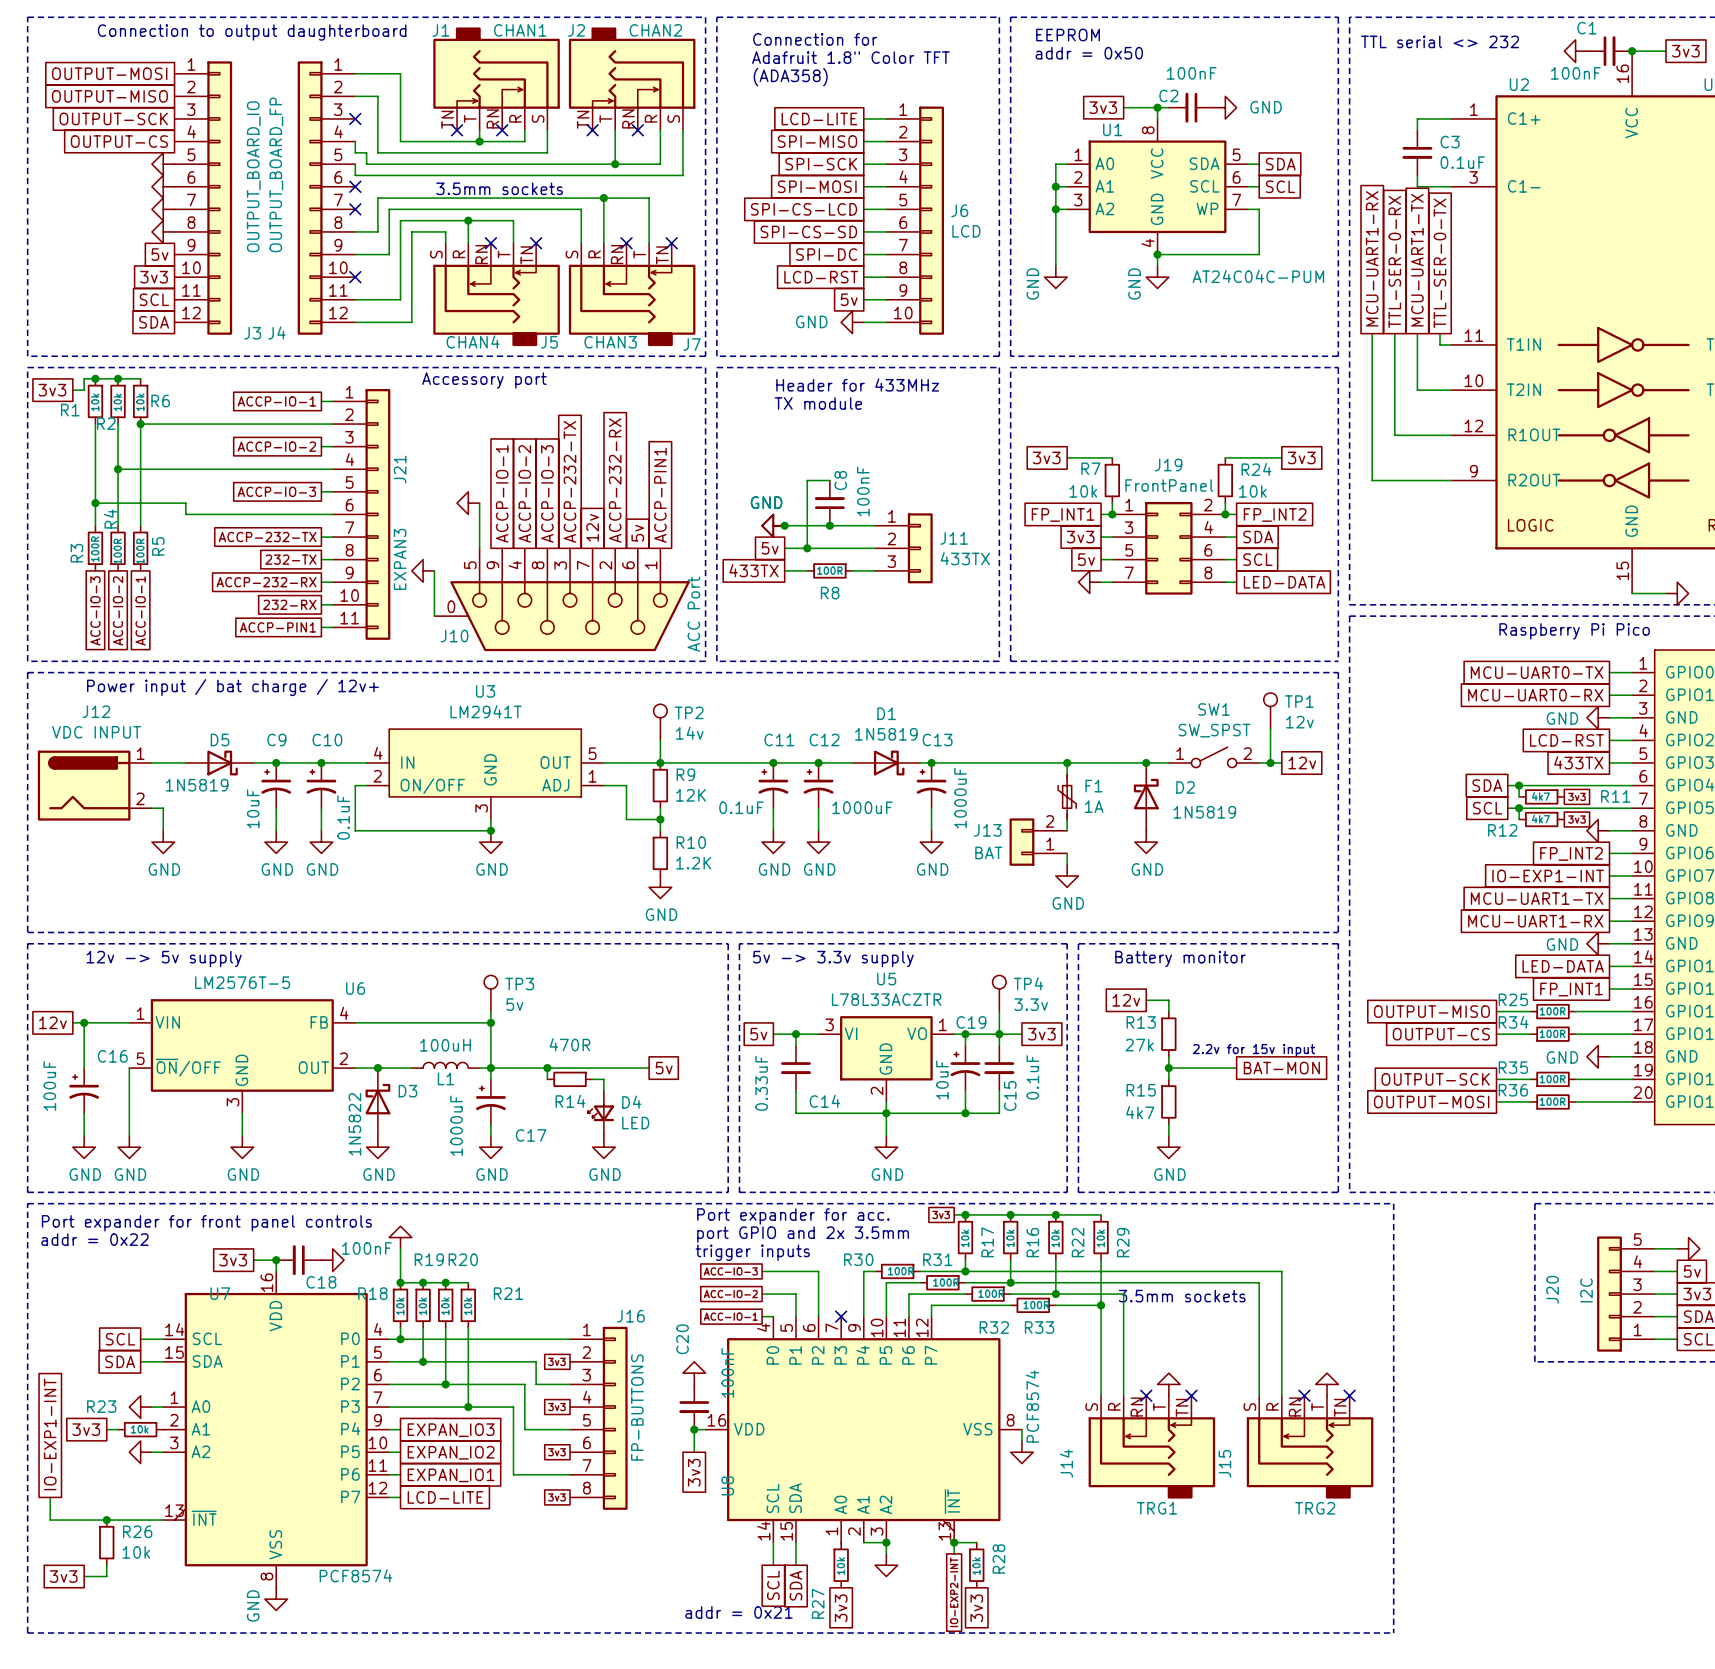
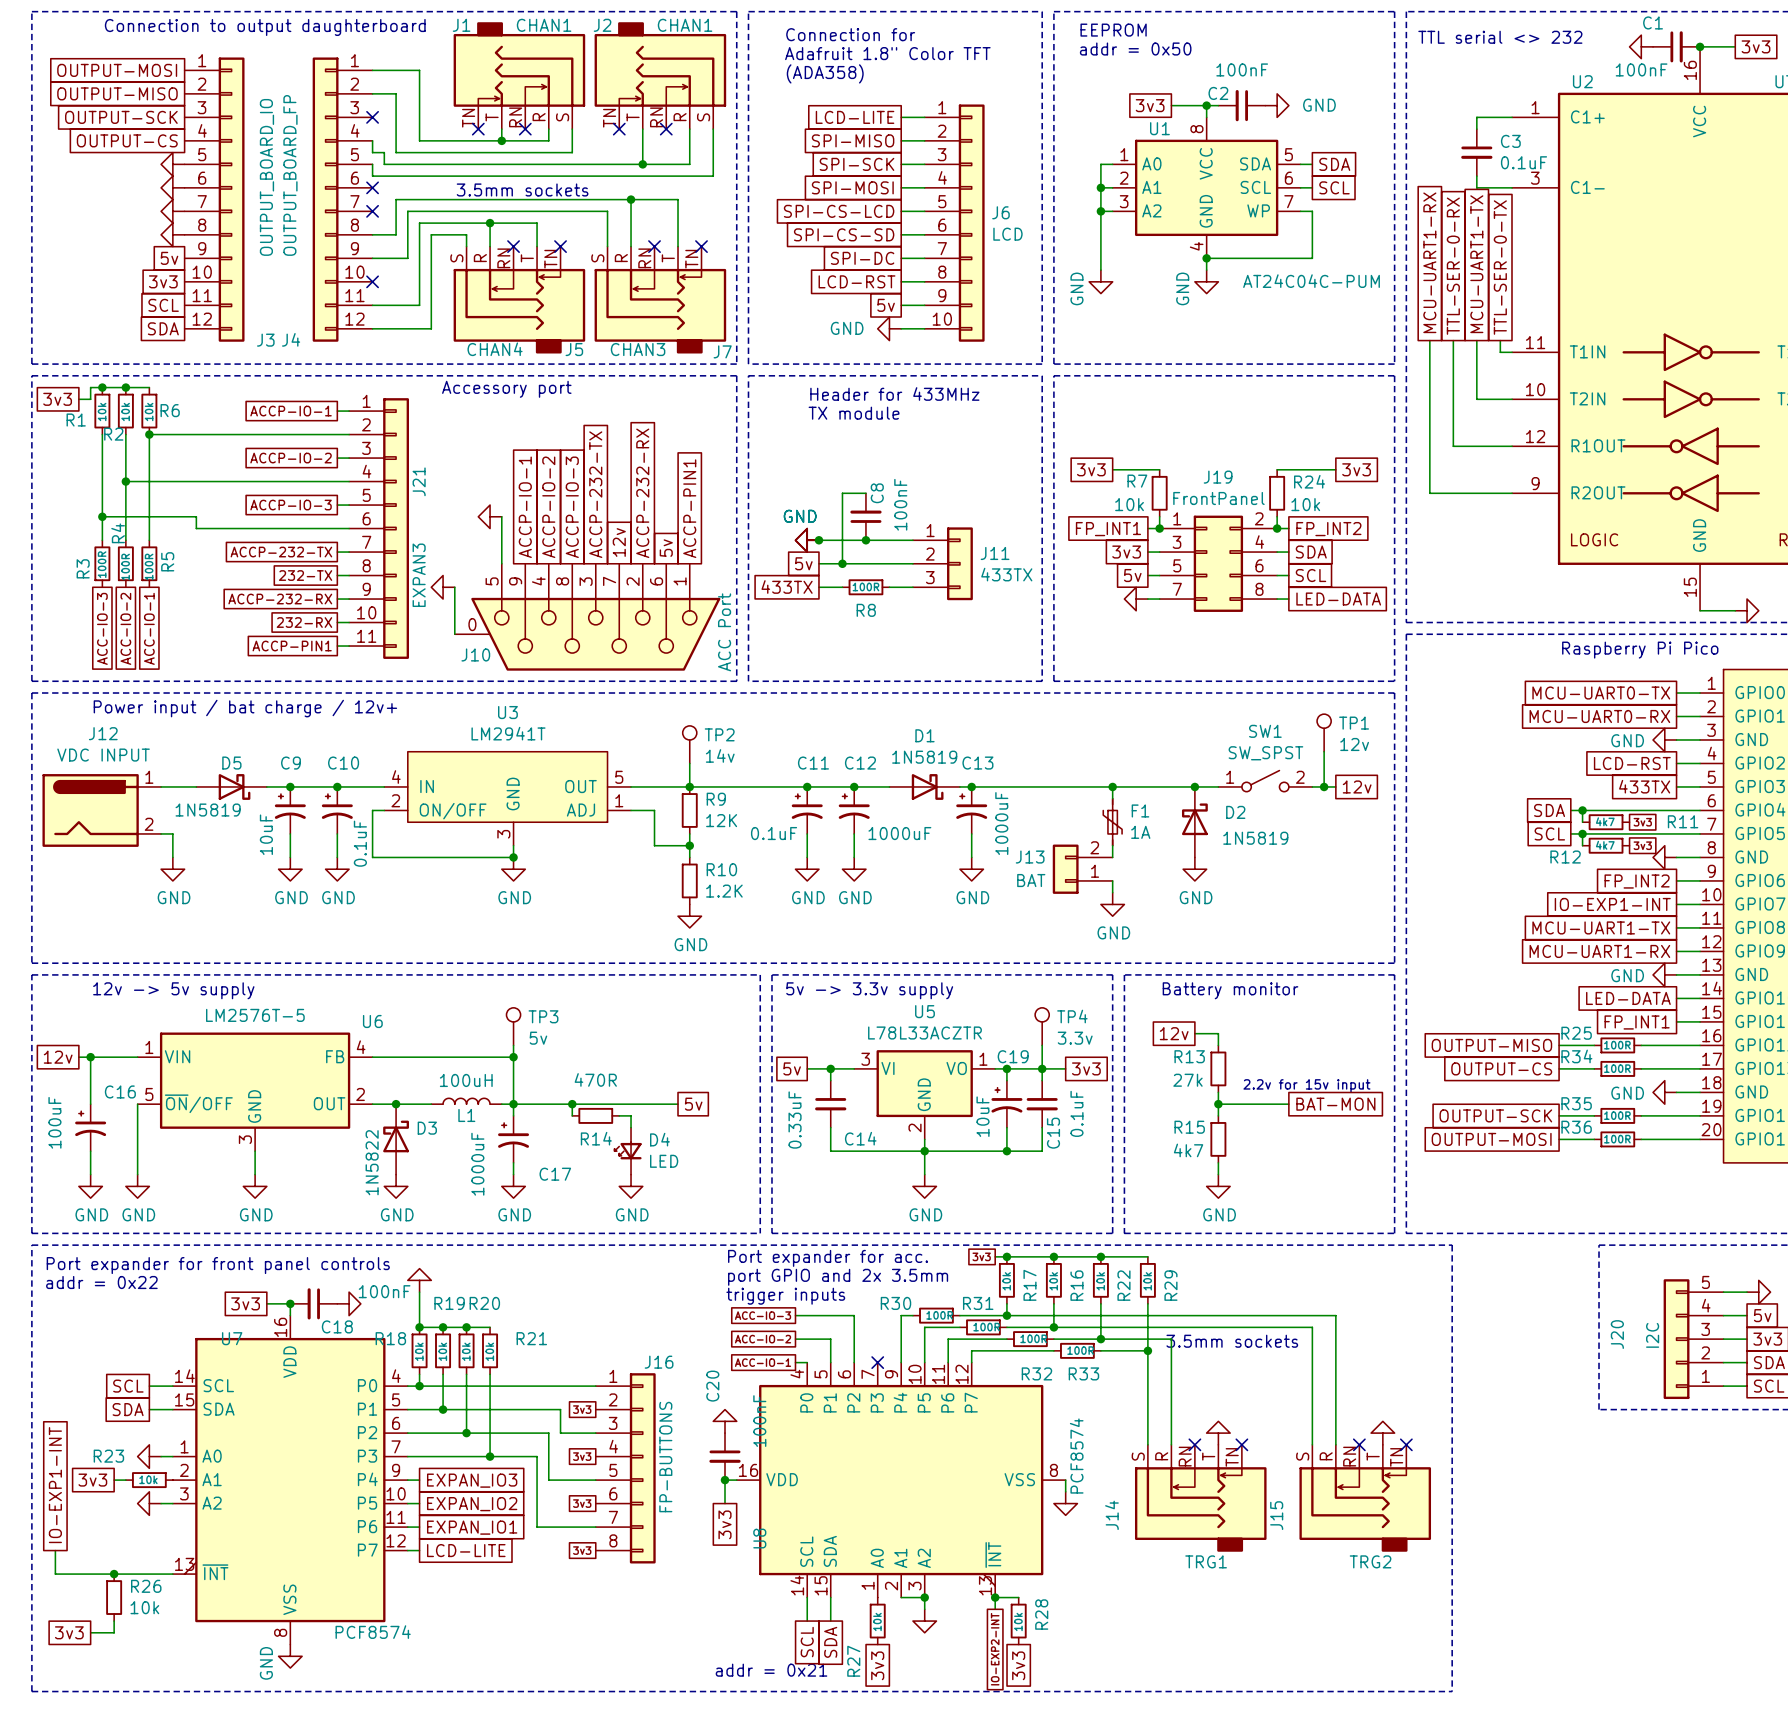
J2 value: CHAN2 (655, 30) -> CHAN1 (685, 25)

